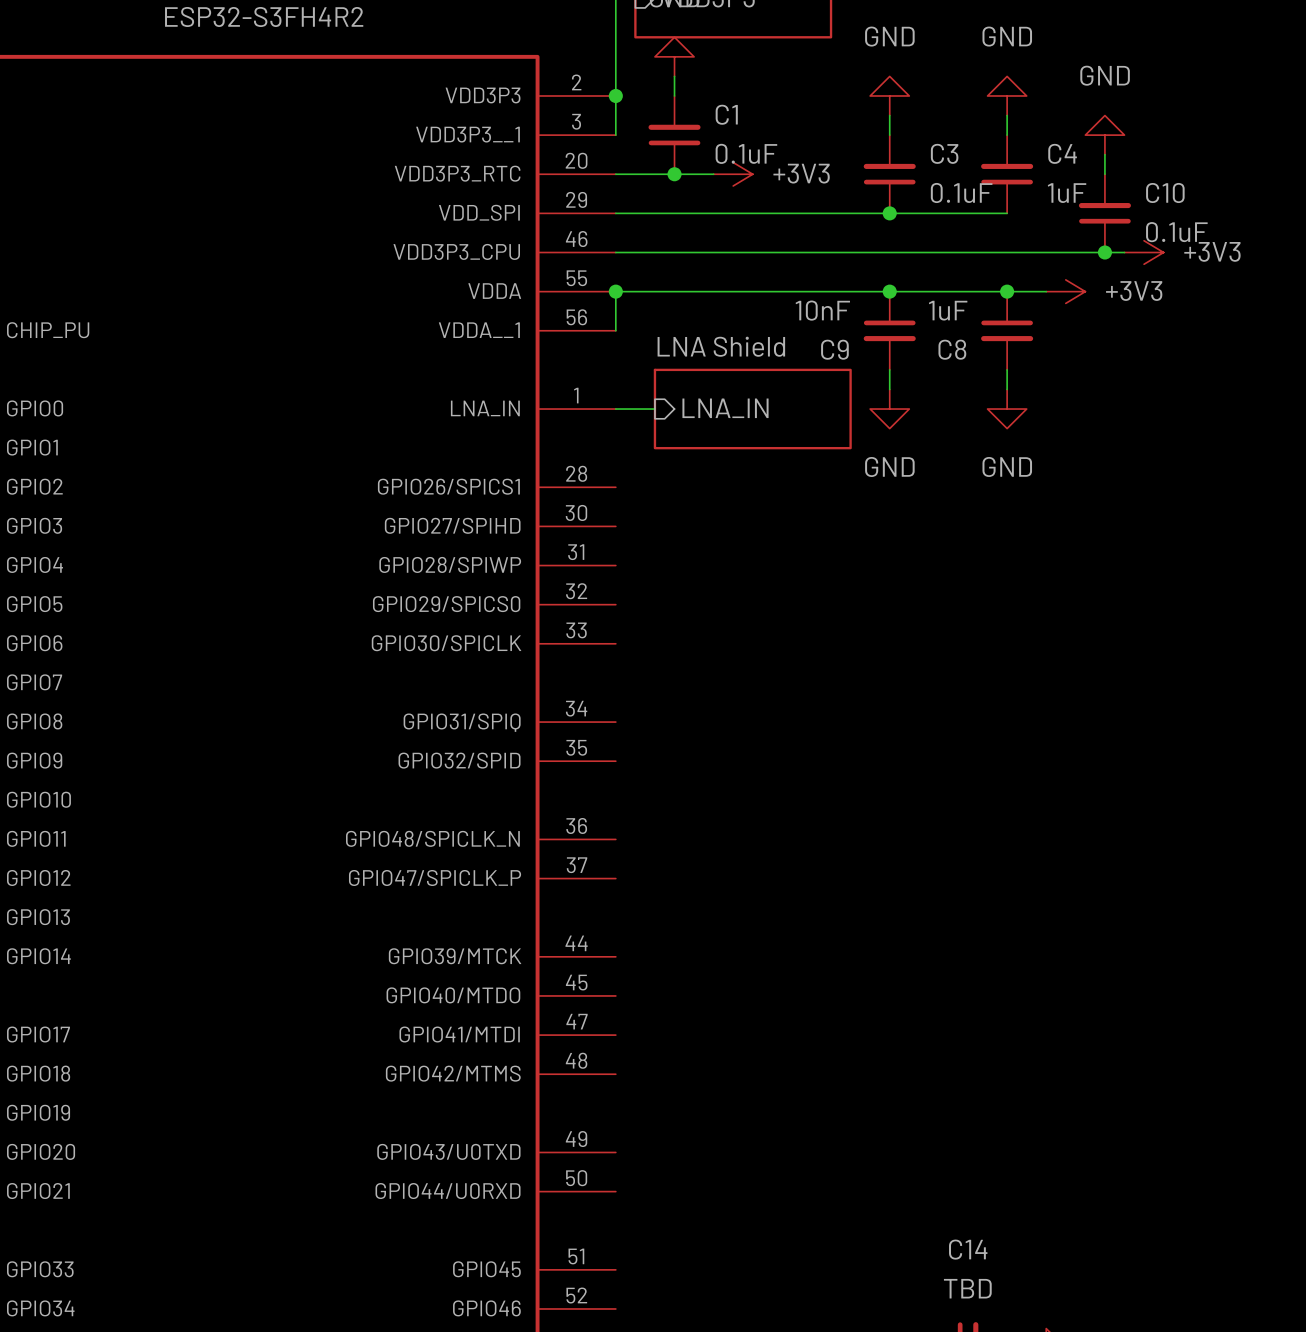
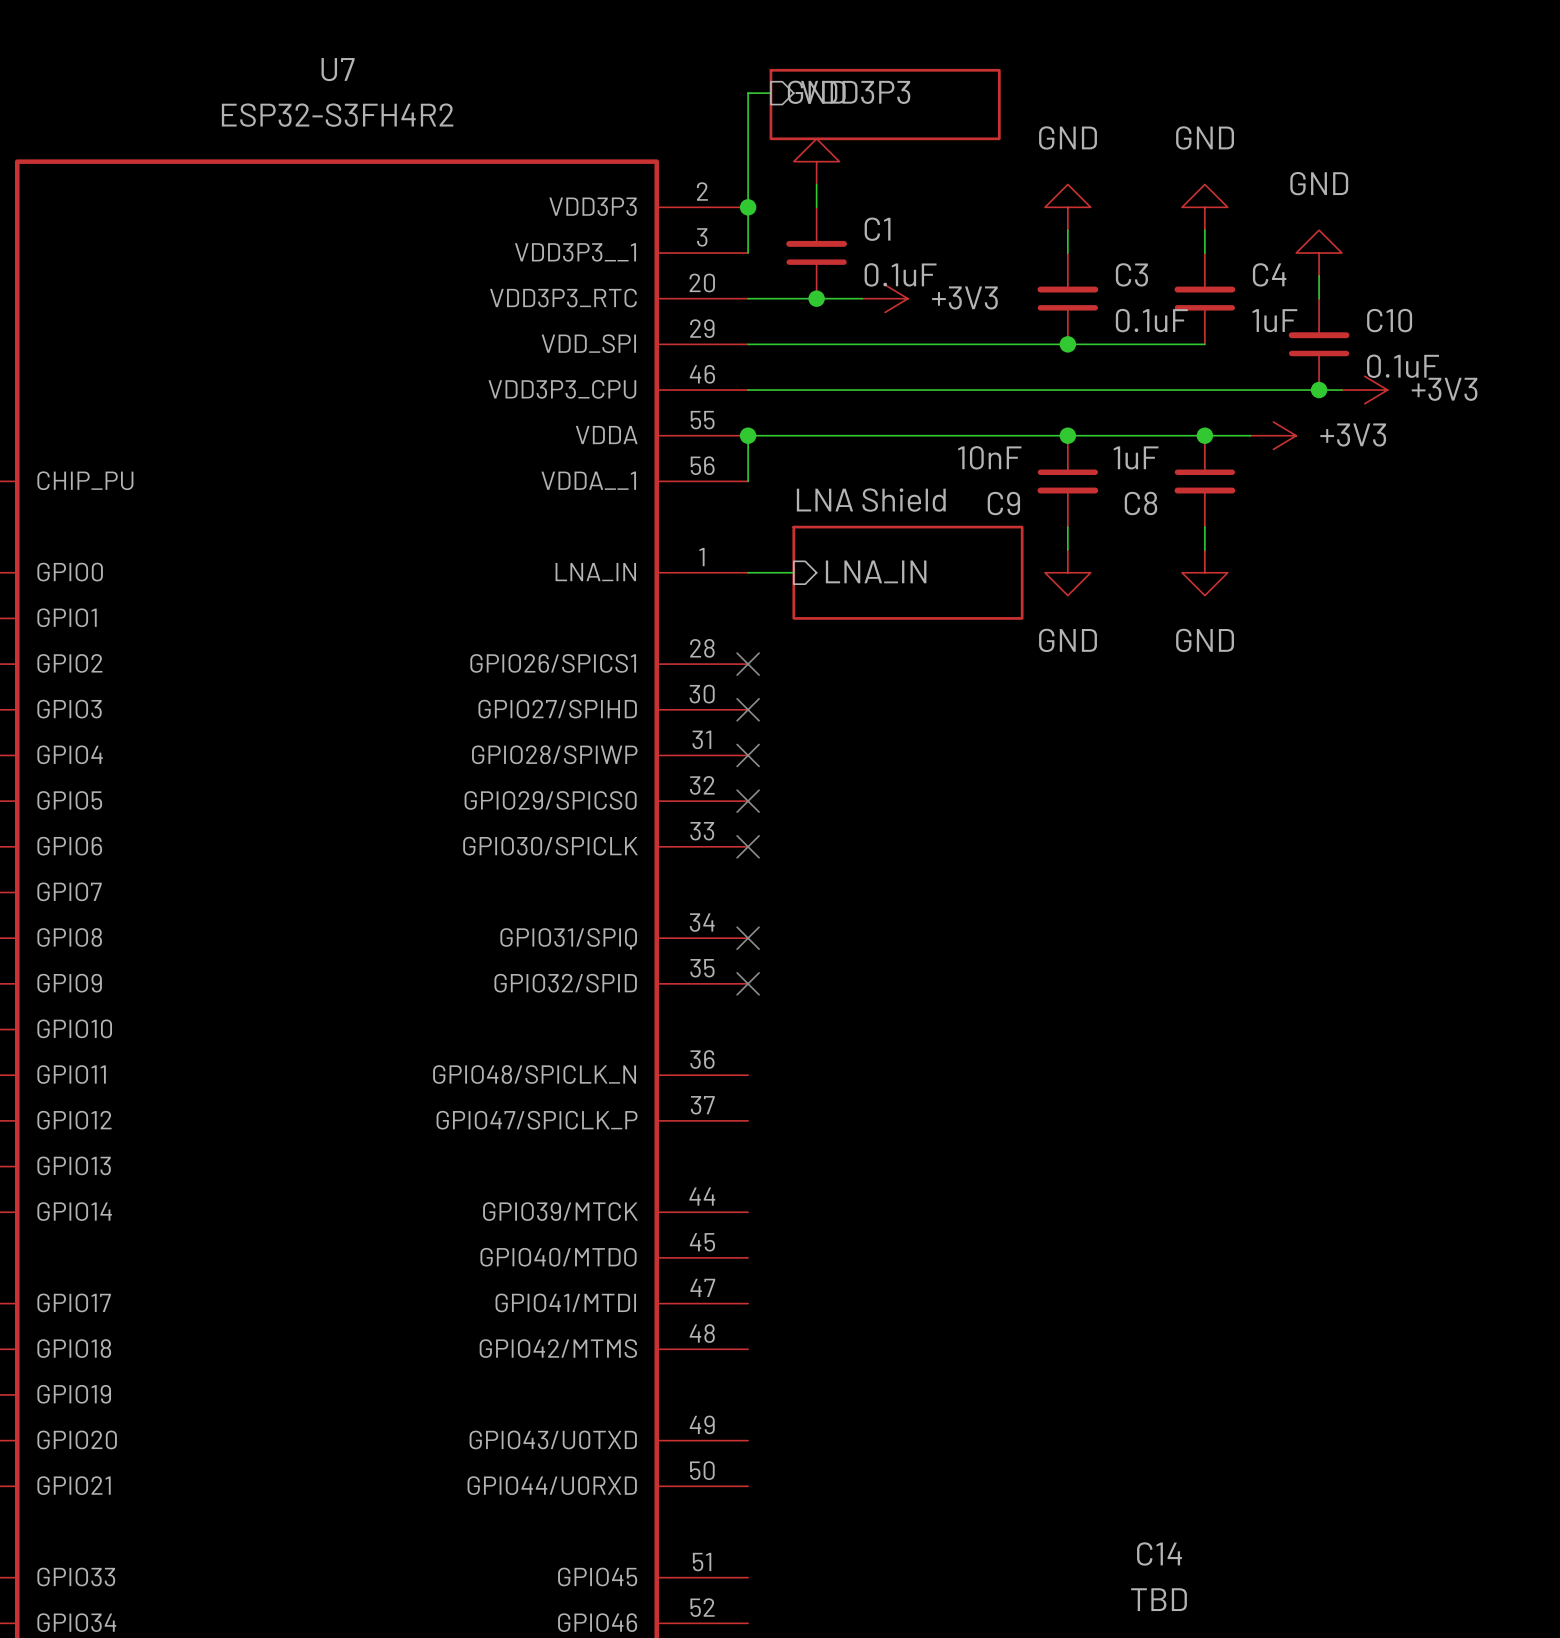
no-connect mark: none -> (748, 664)
no-connect mark: none -> (748, 709)
no-connect mark: none -> (748, 755)
no-connect mark: none -> (748, 801)
no-connect mark: none -> (748, 846)
no-connect mark: none -> (748, 938)
no-connect mark: none -> (748, 983)

